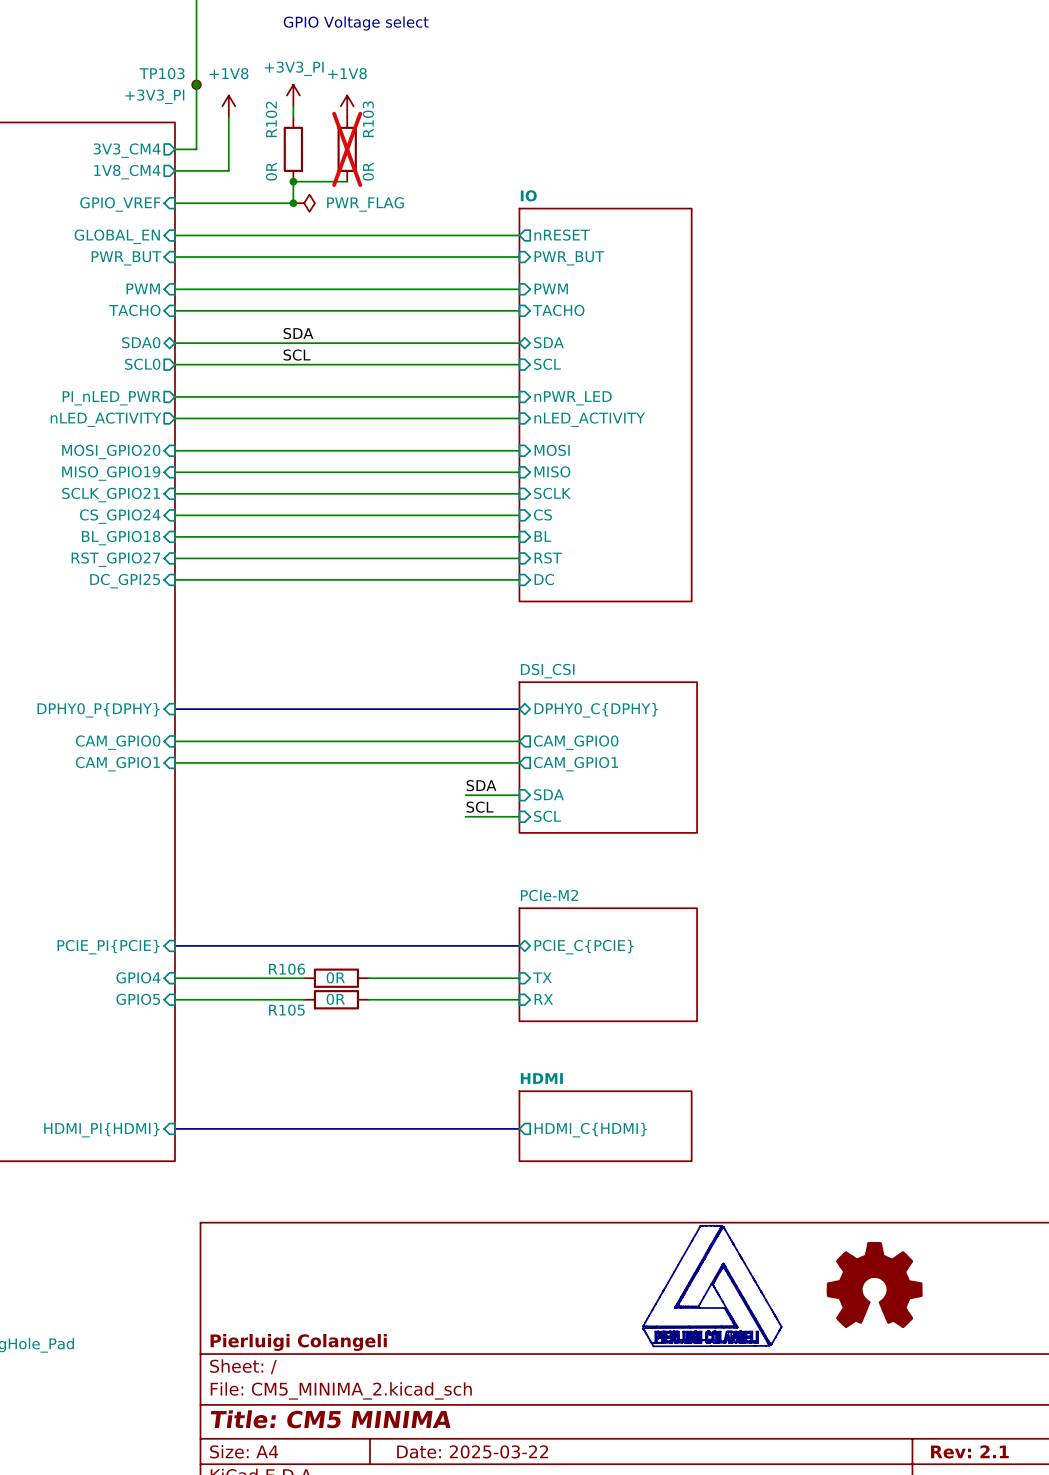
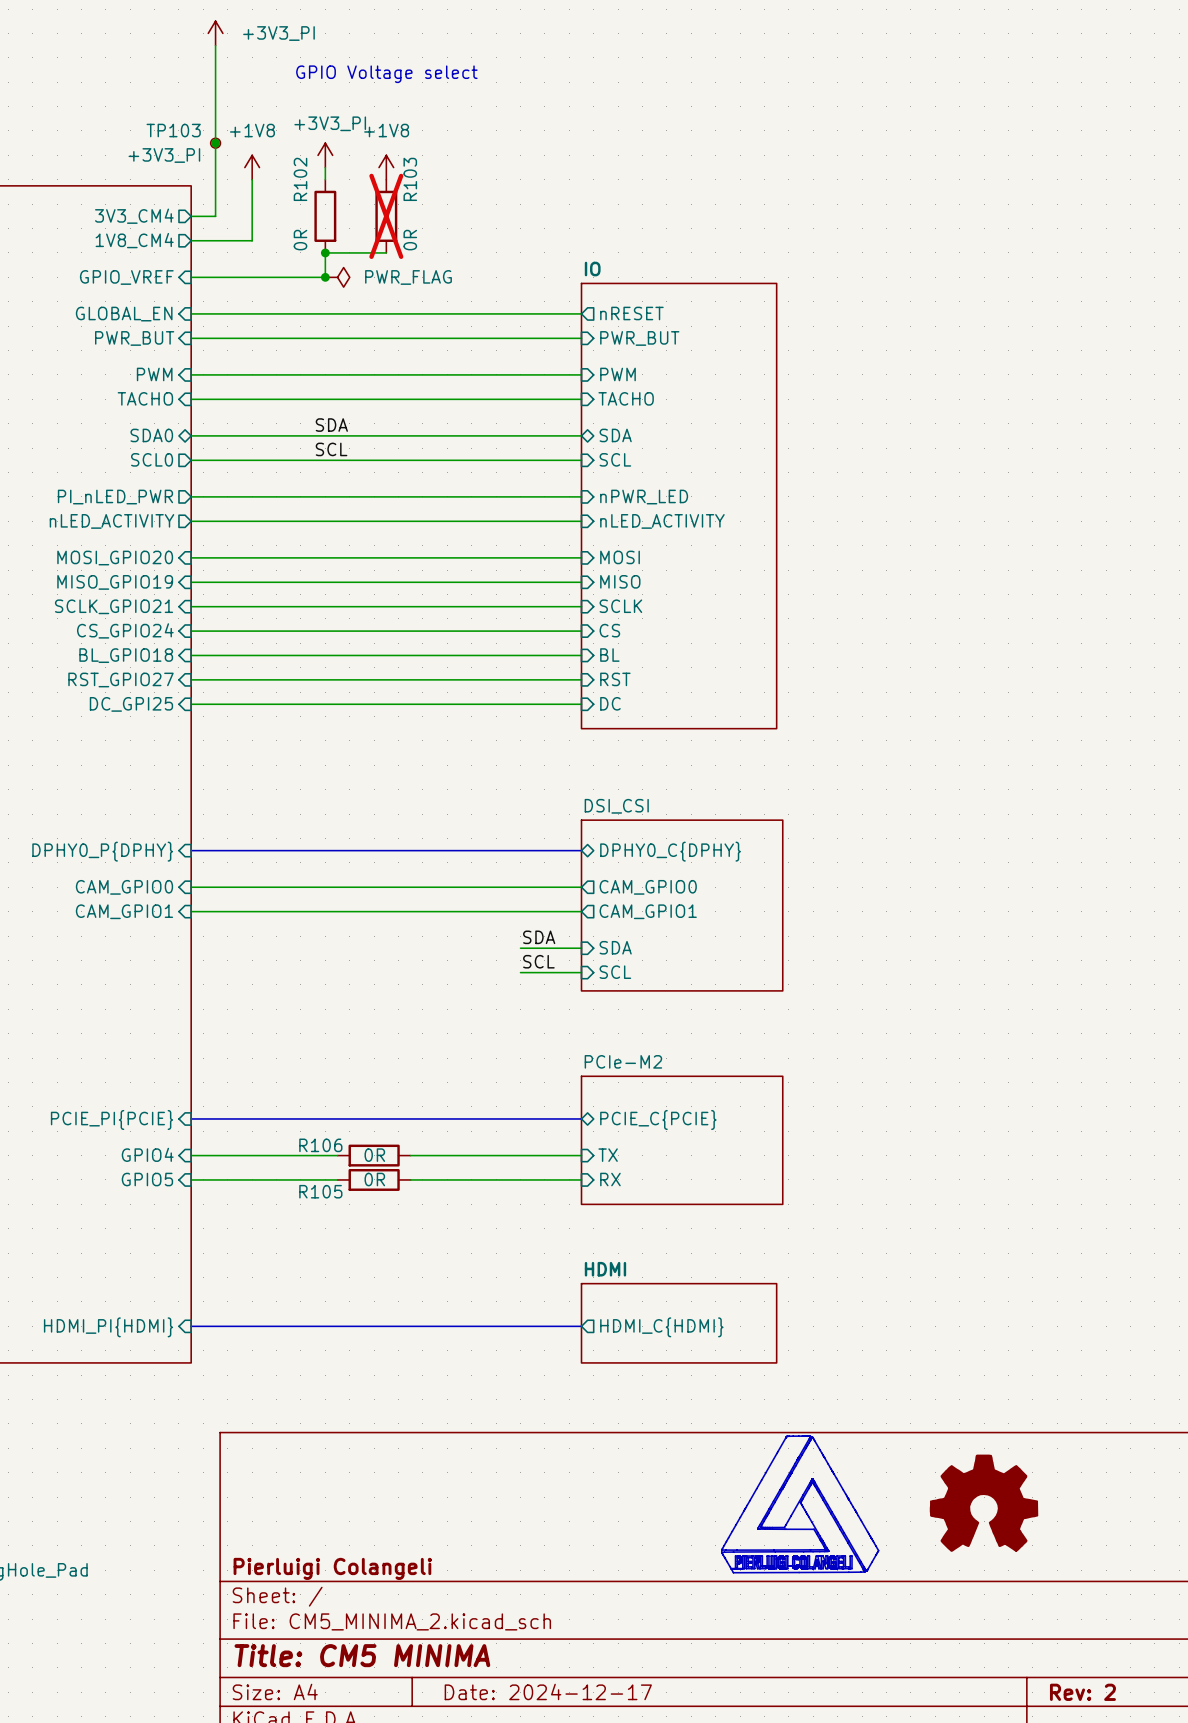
title block: Date: 2025-03-22 (472, 1451) -> Date: 2024-12-17 (548, 1691)
title block: Rev: 2.1 (969, 1451) -> Rev: 2 (1082, 1692)

